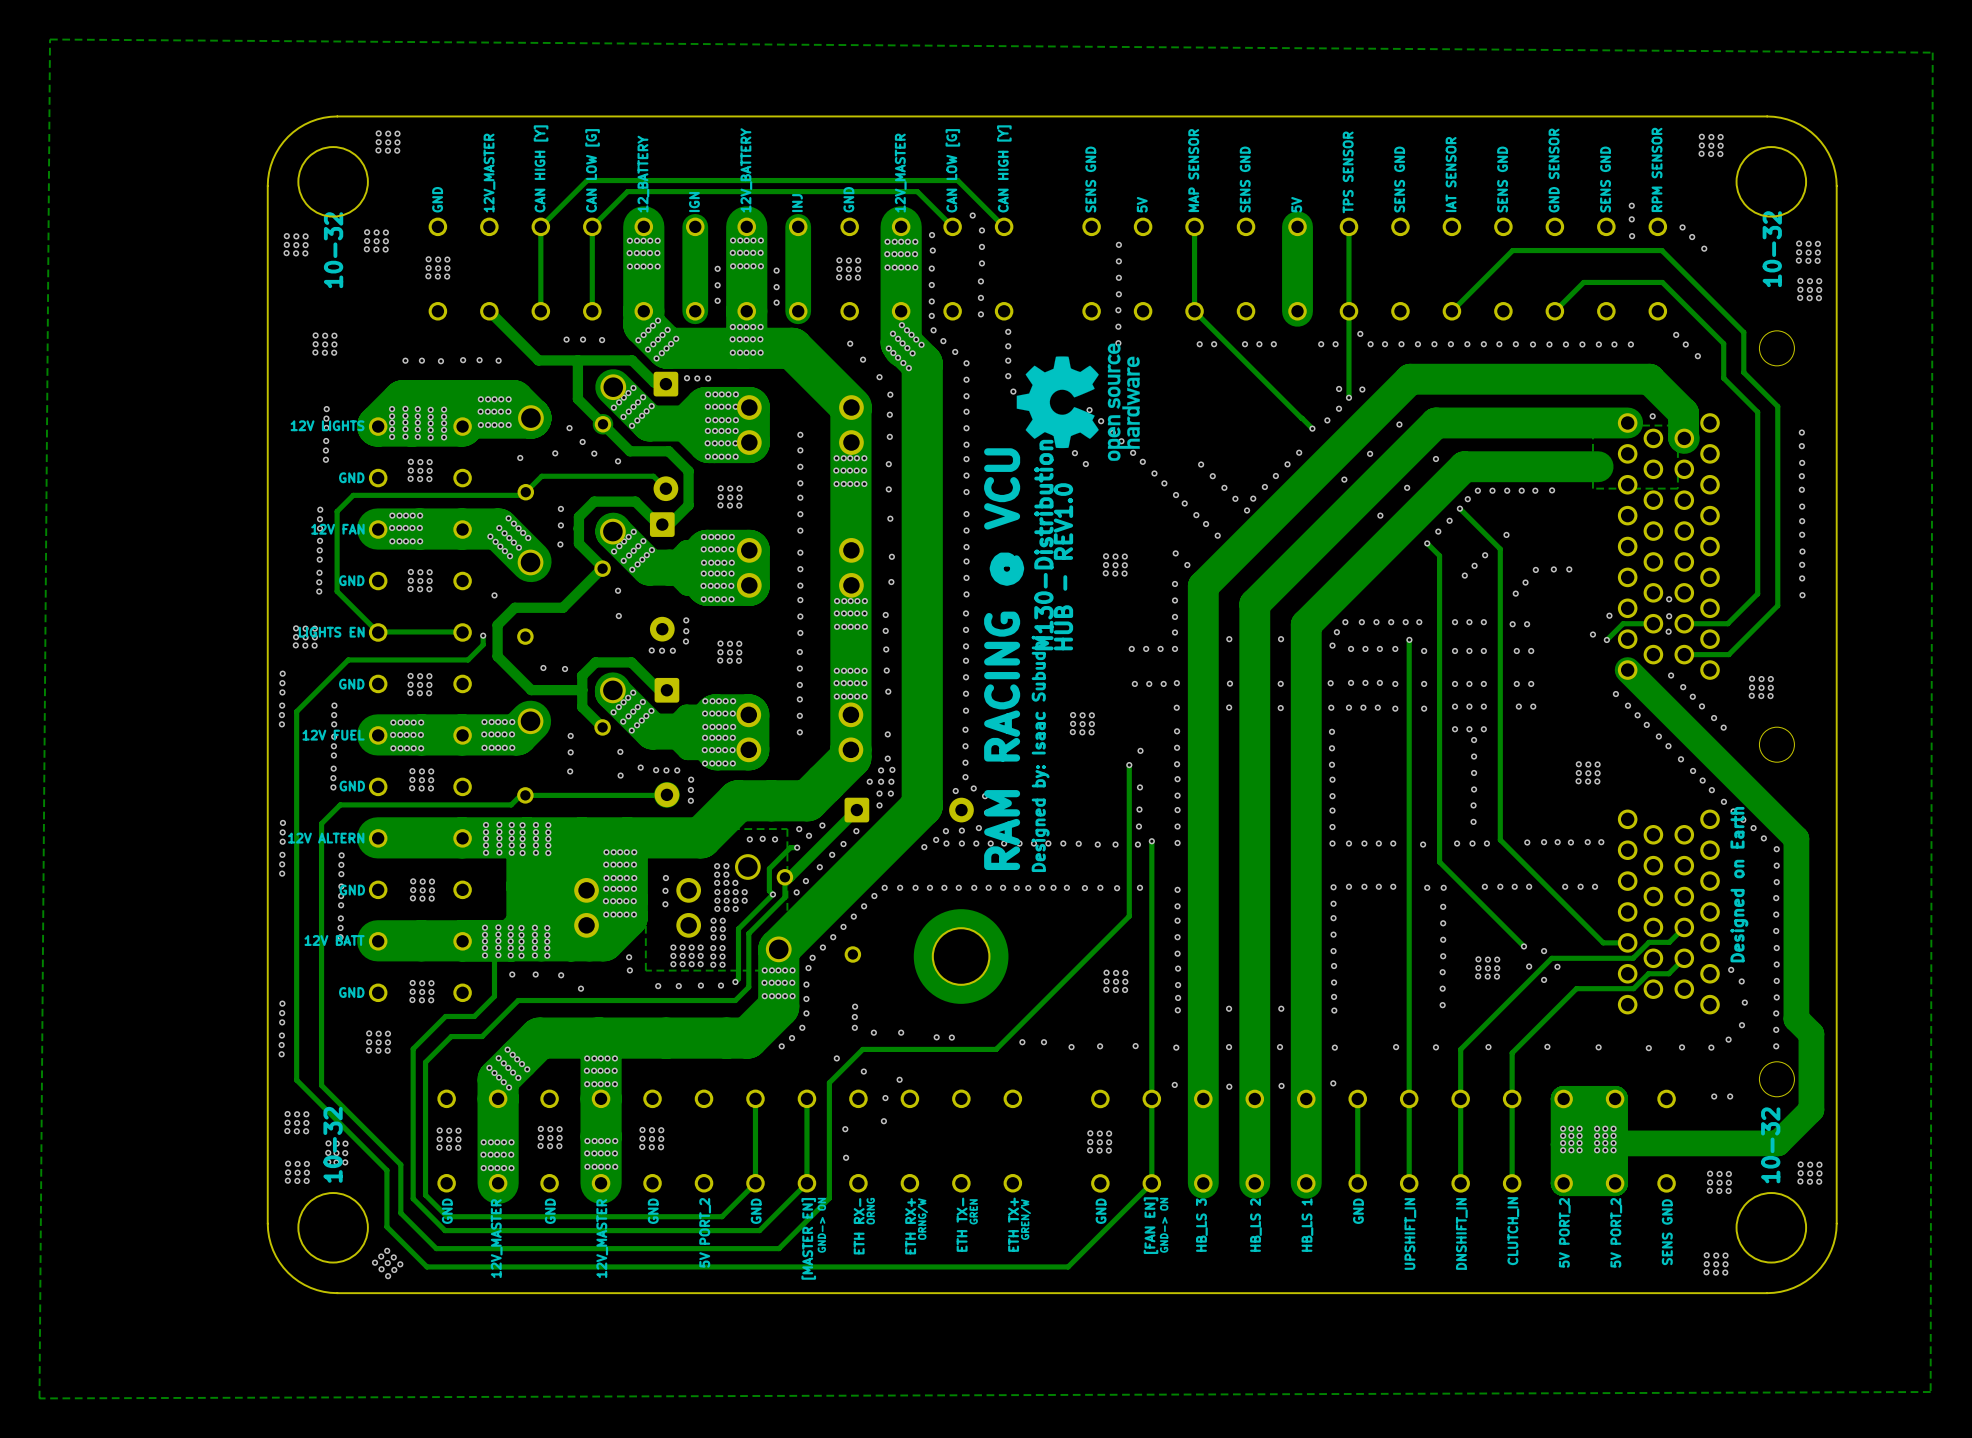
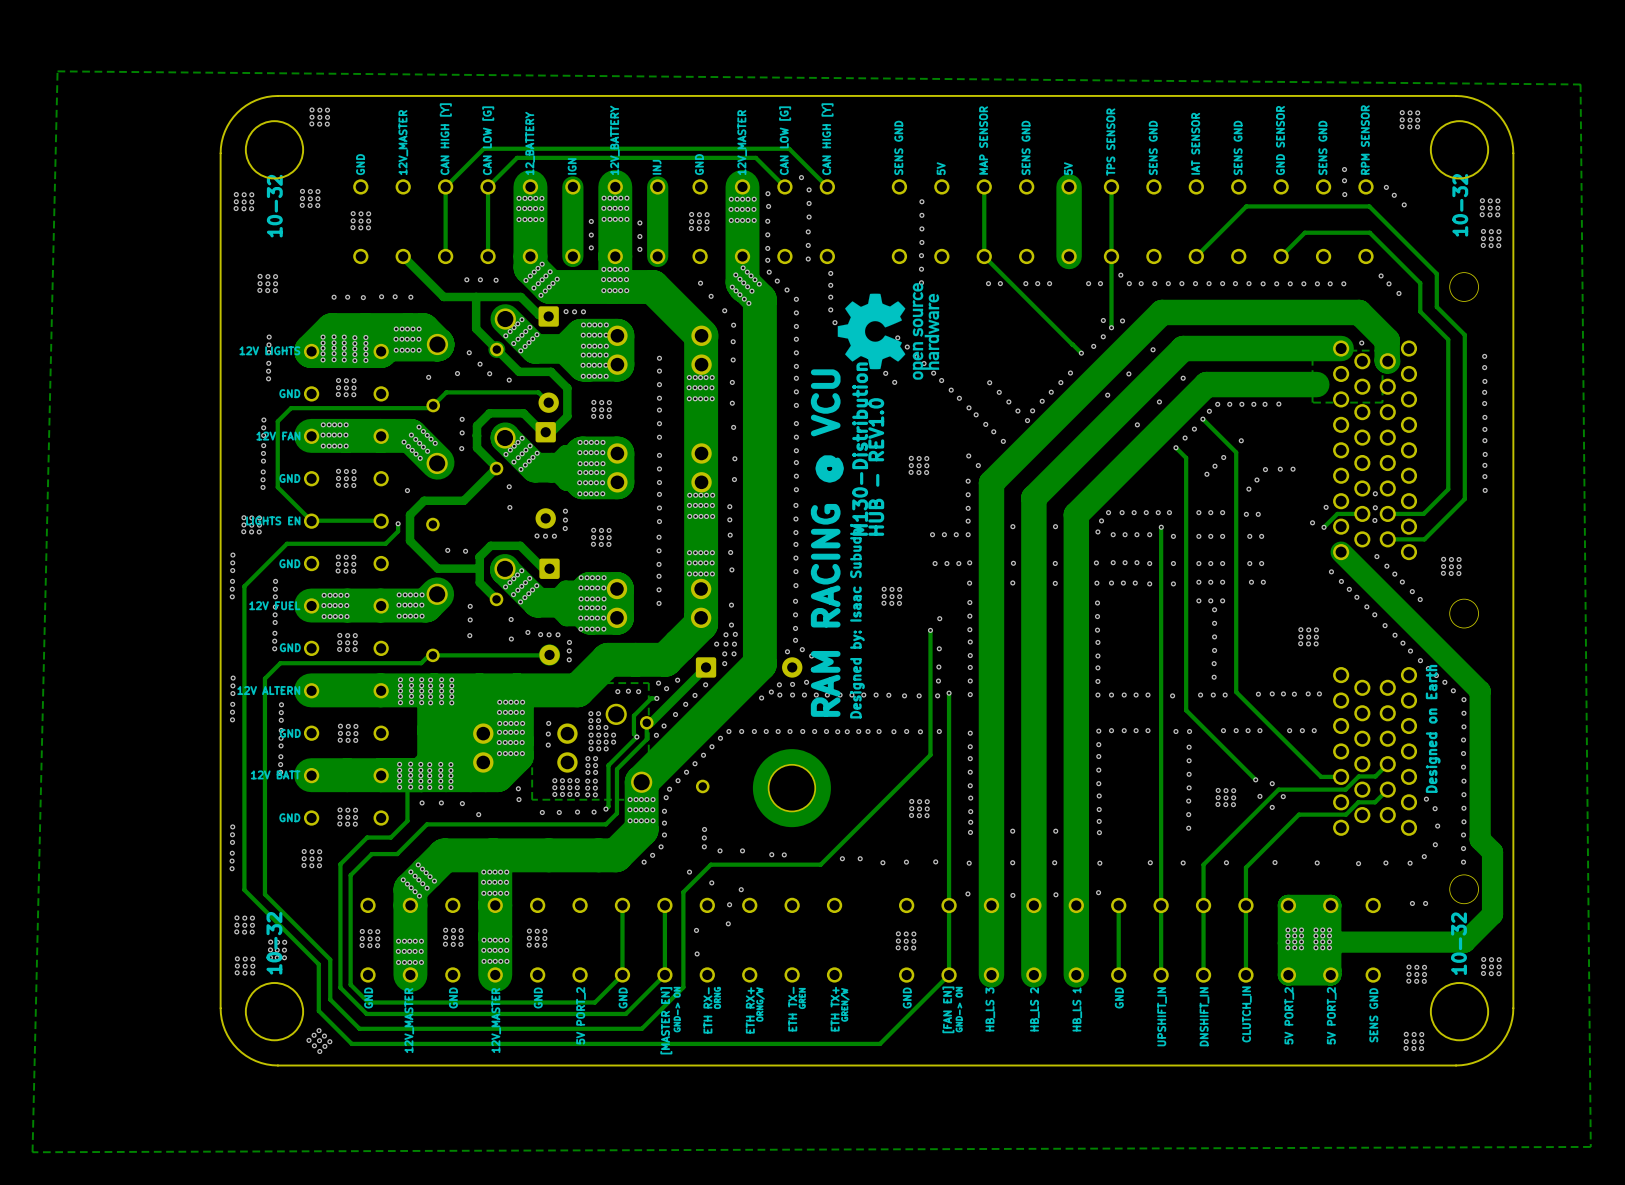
zone outline: (1930, 1392) (1932, 52) (50, 39) (39, 1398) -> (1590, 1146) (1580, 84) (57, 71) (32, 1152)

